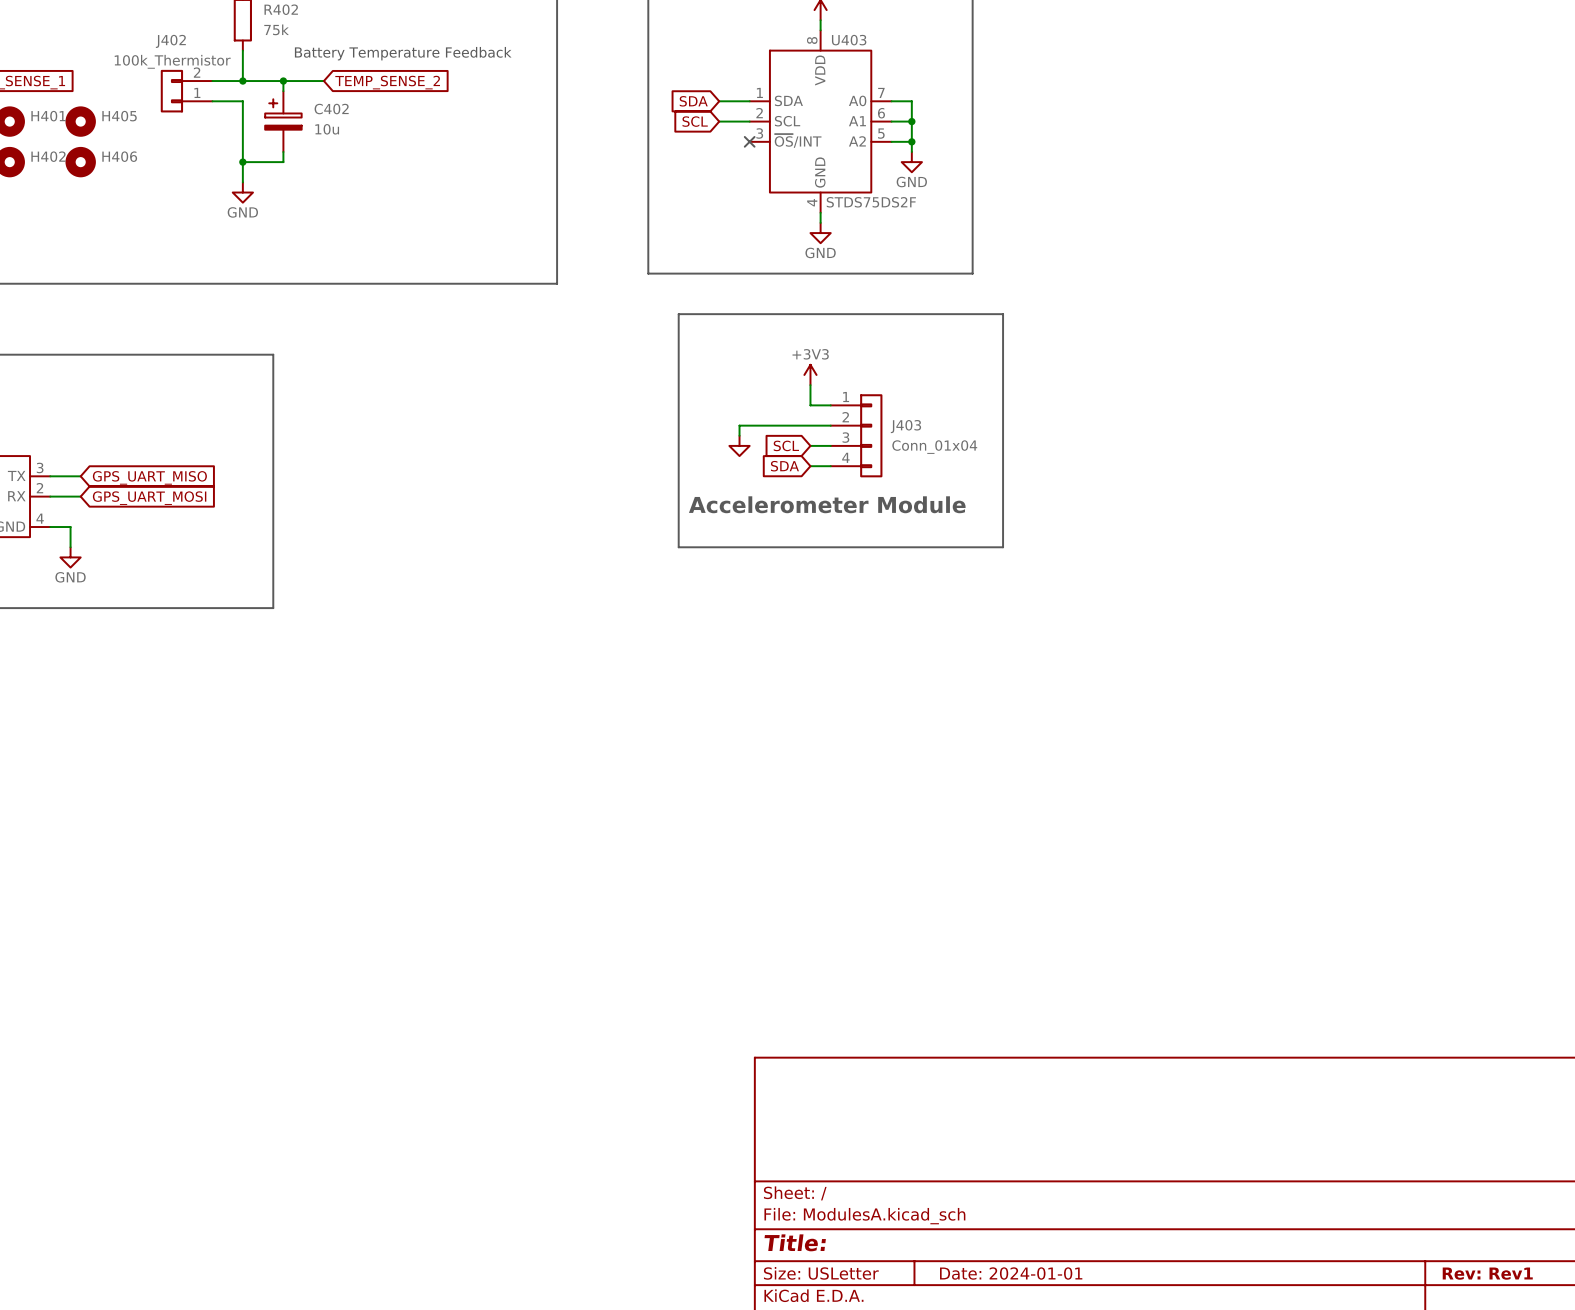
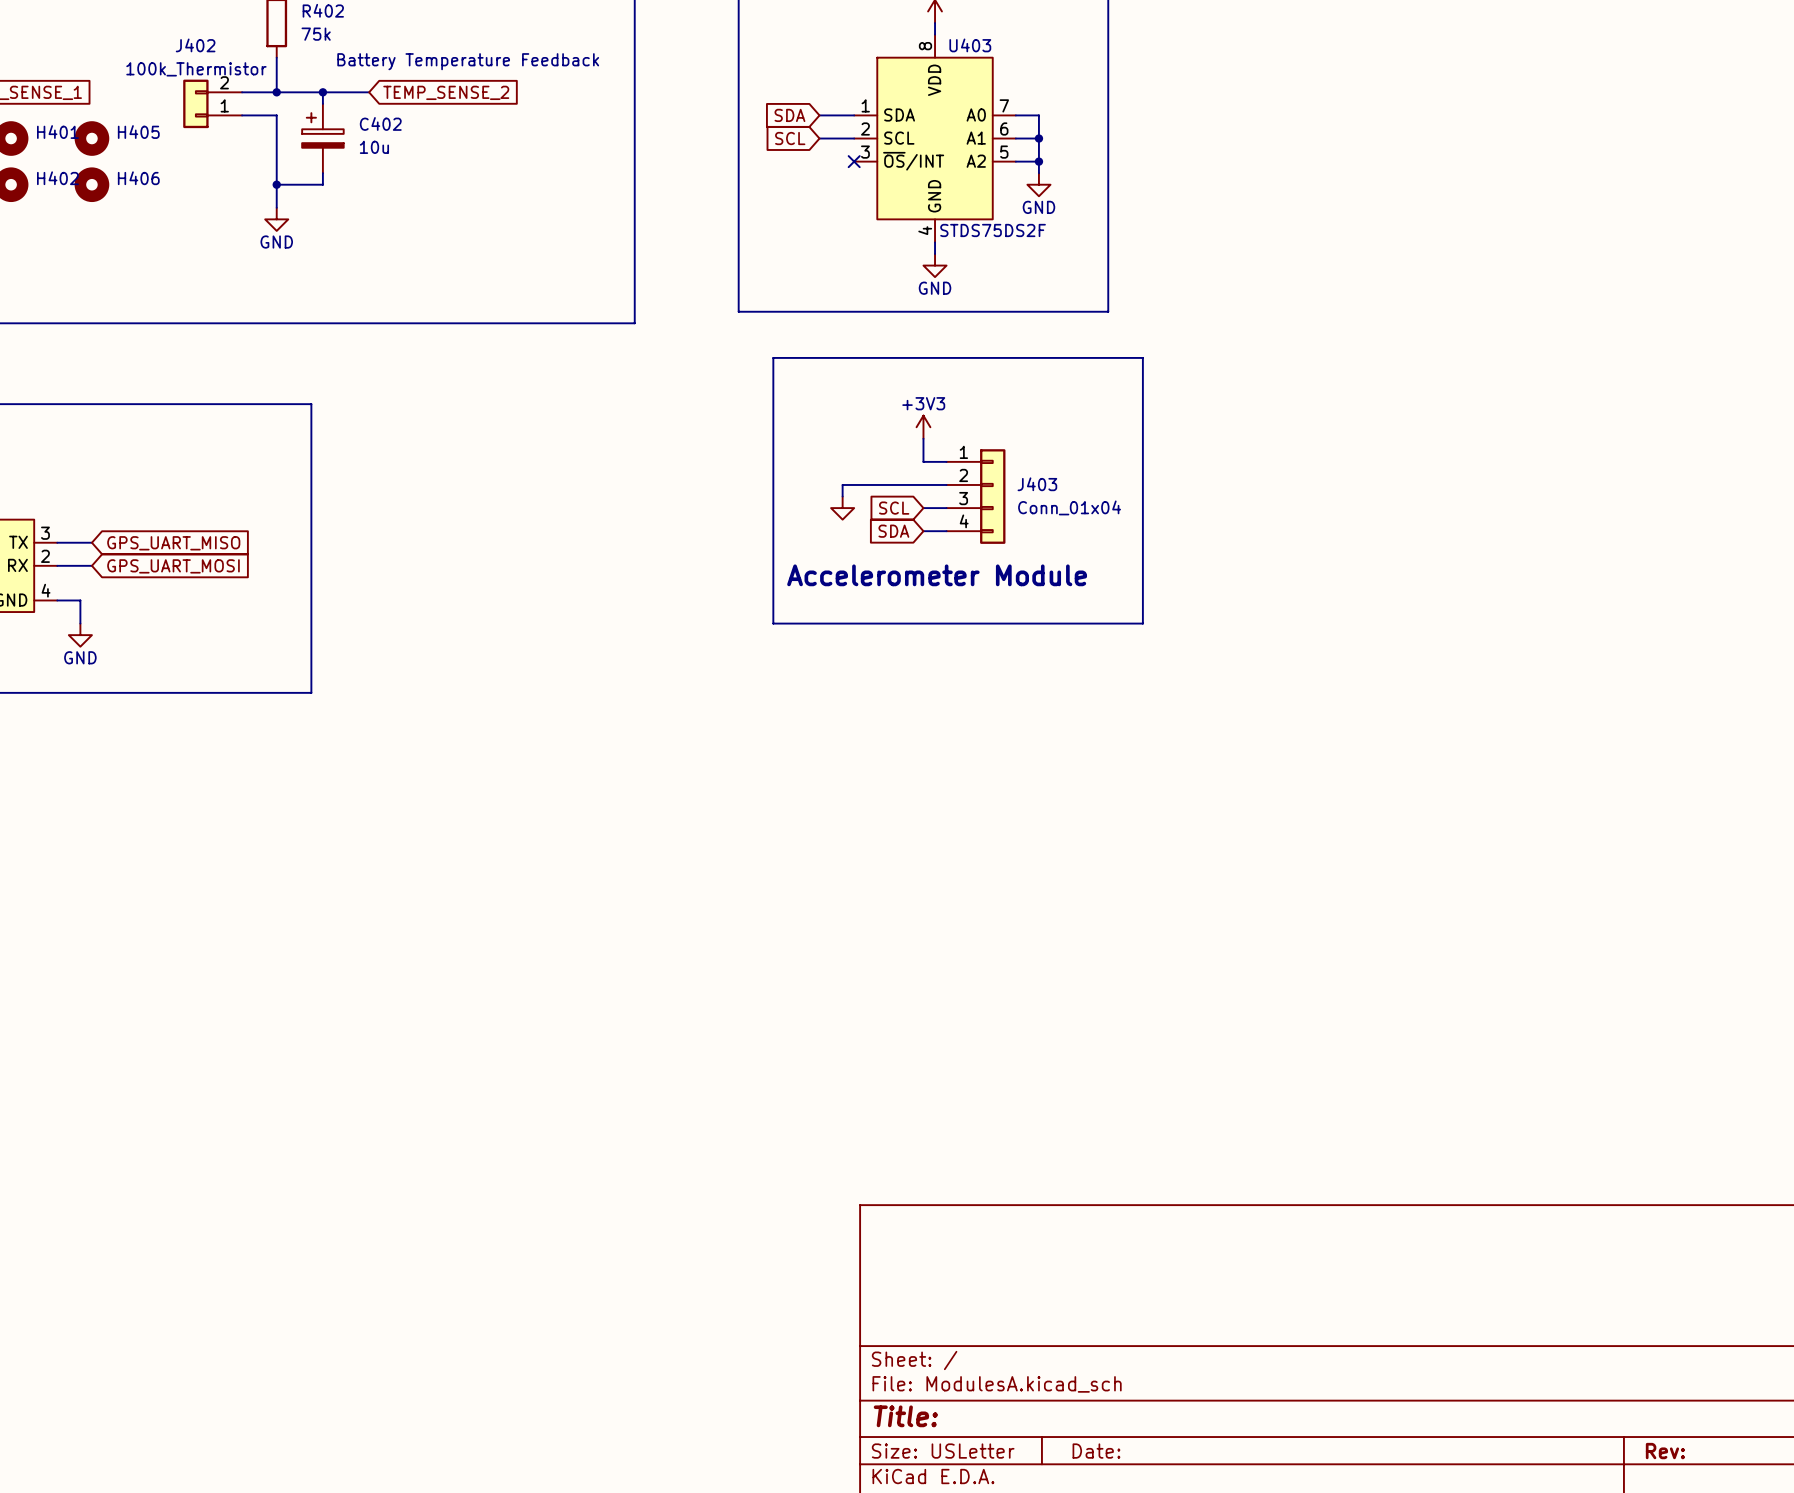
title block: Date: 2024-01-01 (1011, 1273) -> Date: (1096, 1451)
title block: Rev: Rev1 (1487, 1273) -> Rev: (1665, 1451)

